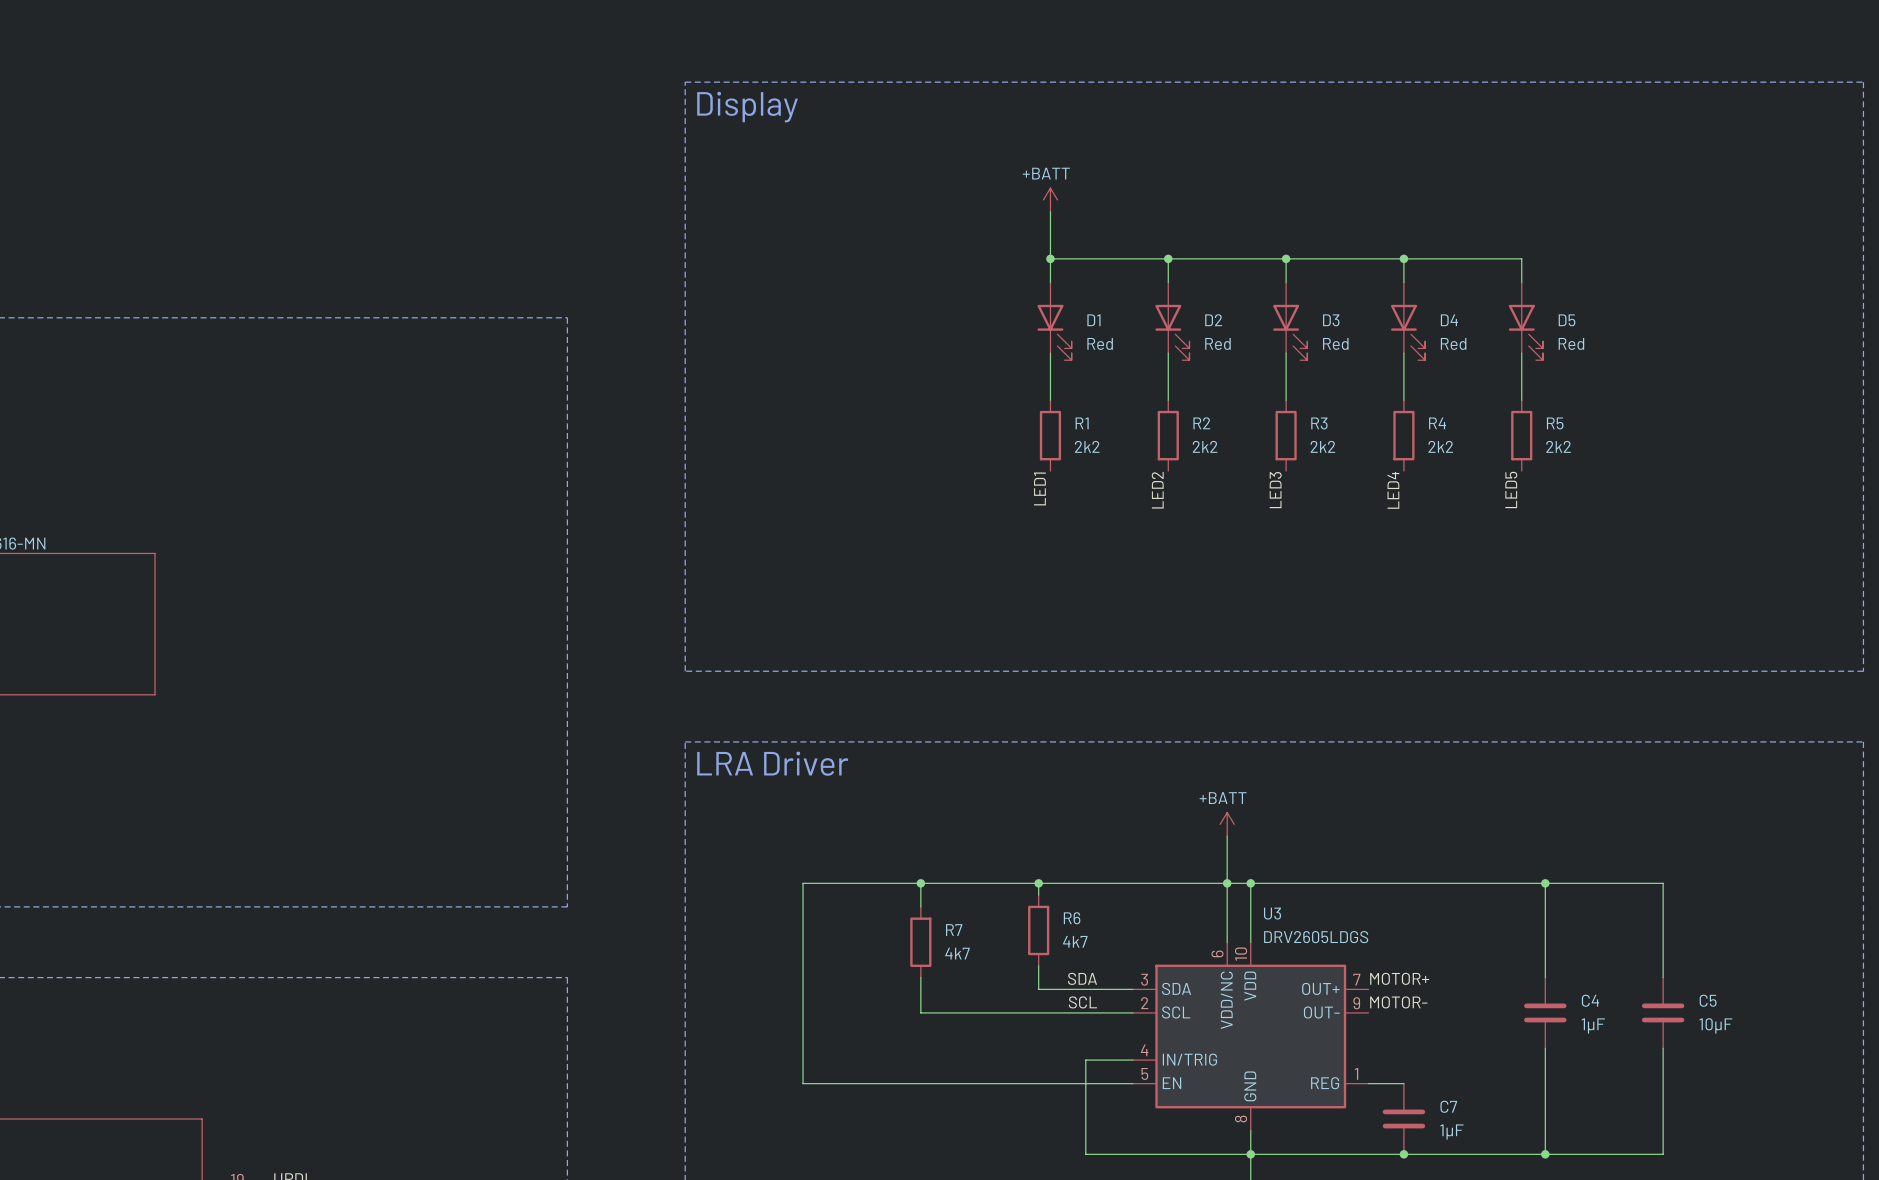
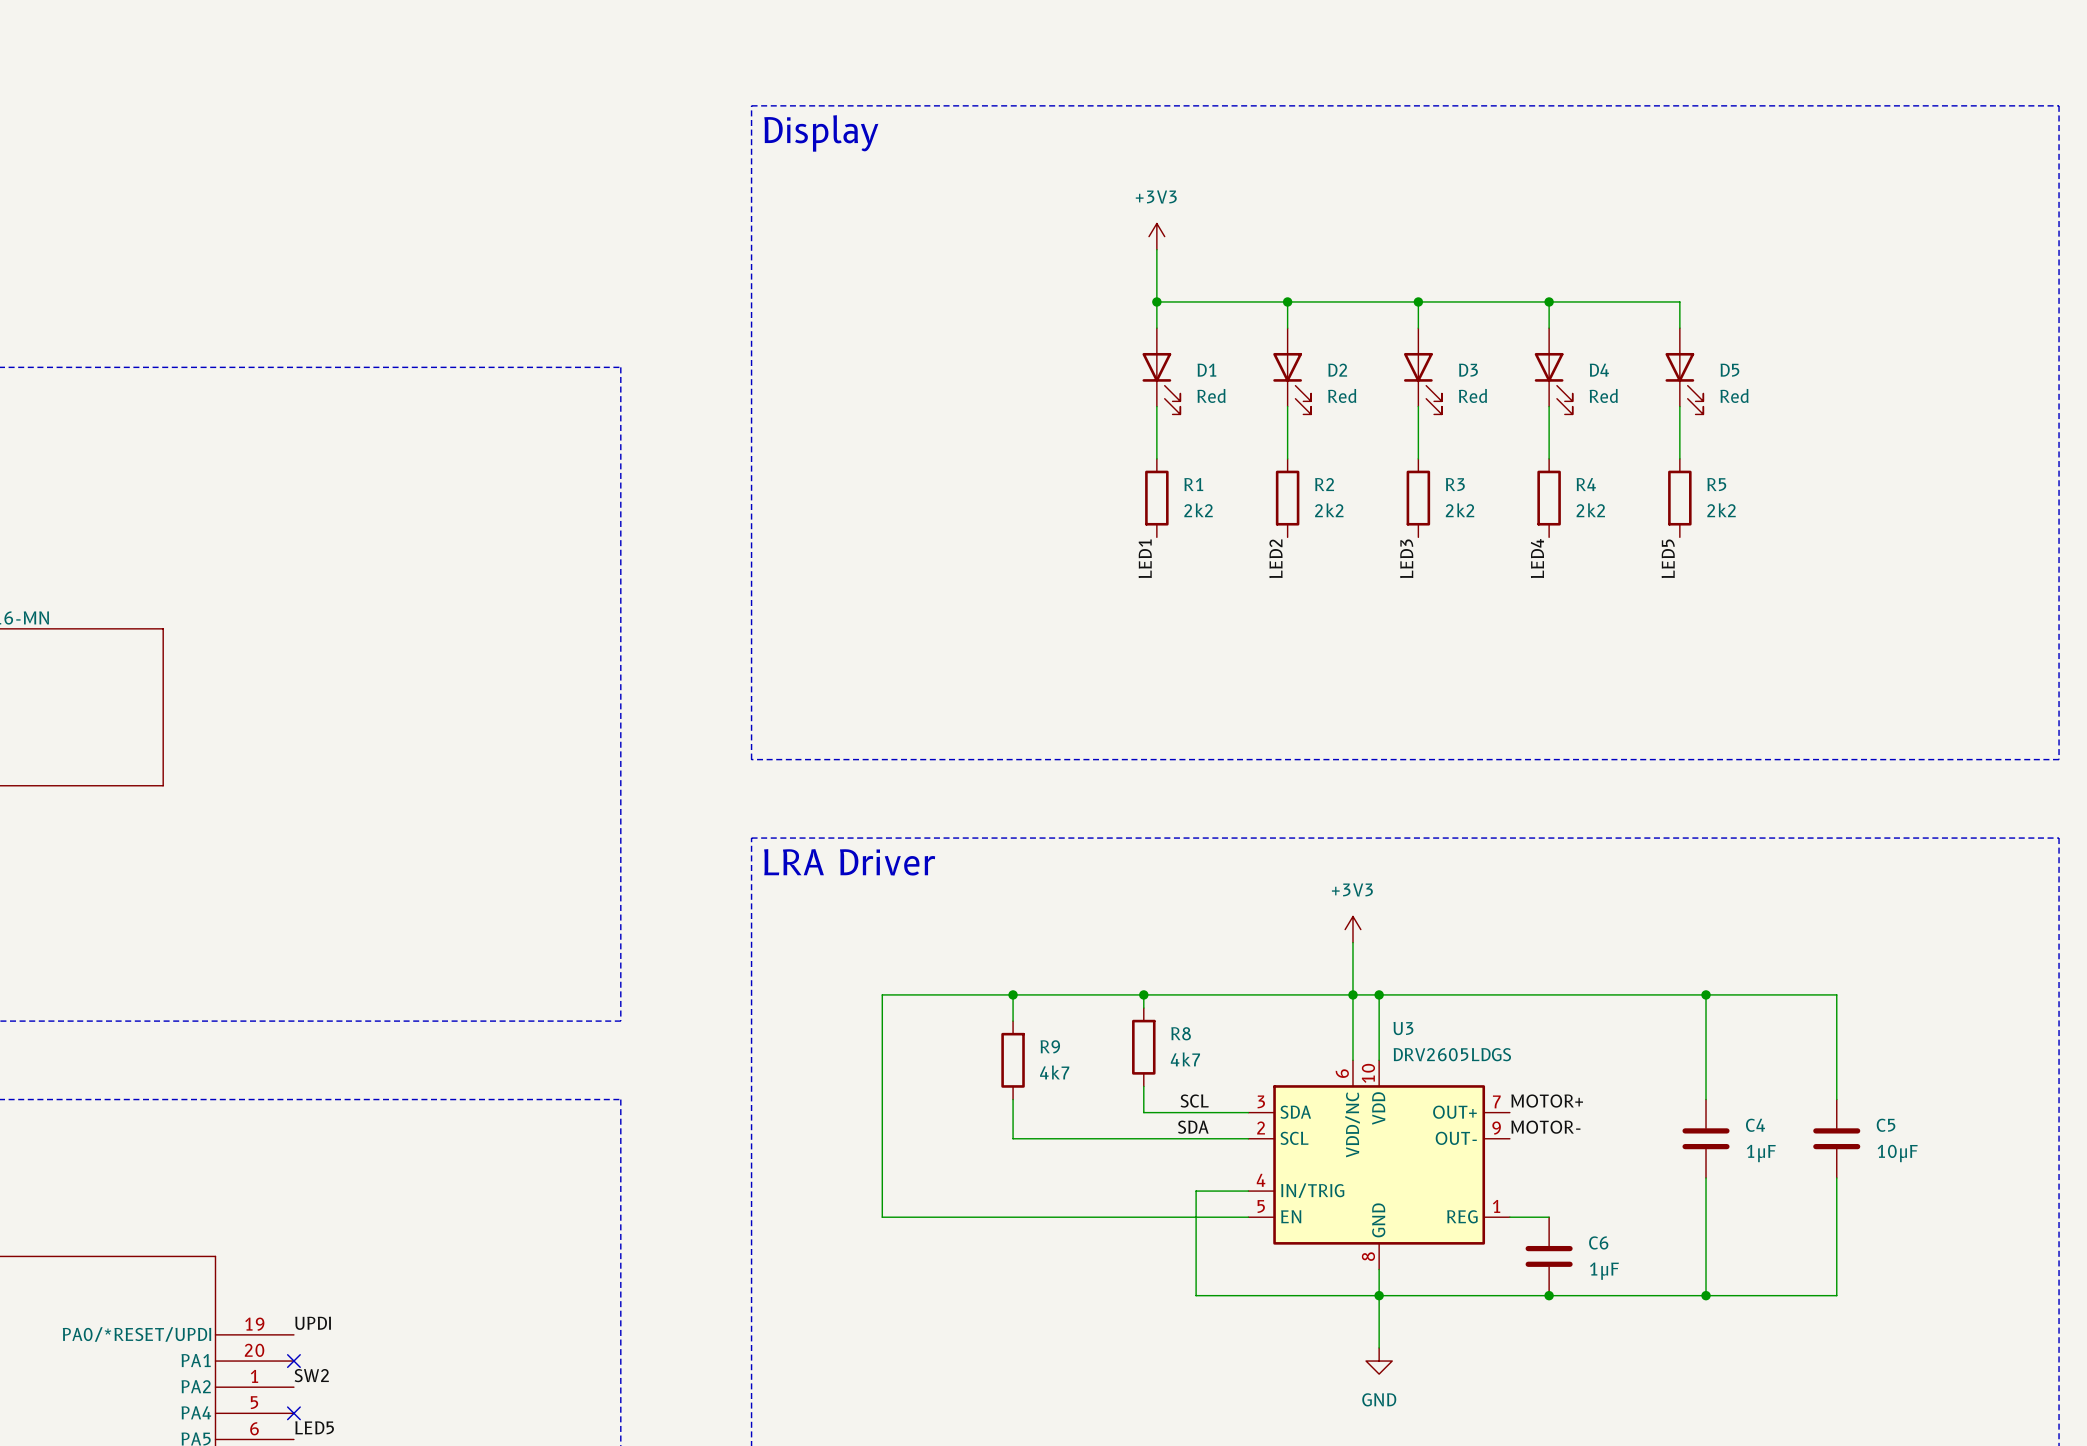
power symbol: +BATT (1050, 199) -> +3V3 (1156, 236)
power symbol: +BATT (1227, 824) -> +3V3 (1352, 929)
R6 name: R6 (1072, 918) -> R8 (1181, 1033)
R7 name: R7 (954, 930) -> R9 (1050, 1046)
label: SDA (1082, 978) -> SCL (1194, 1101)
label: SCL (1082, 1002) -> SDA (1193, 1127)
C7 name: C7 (1448, 1106) -> C6 (1598, 1242)

